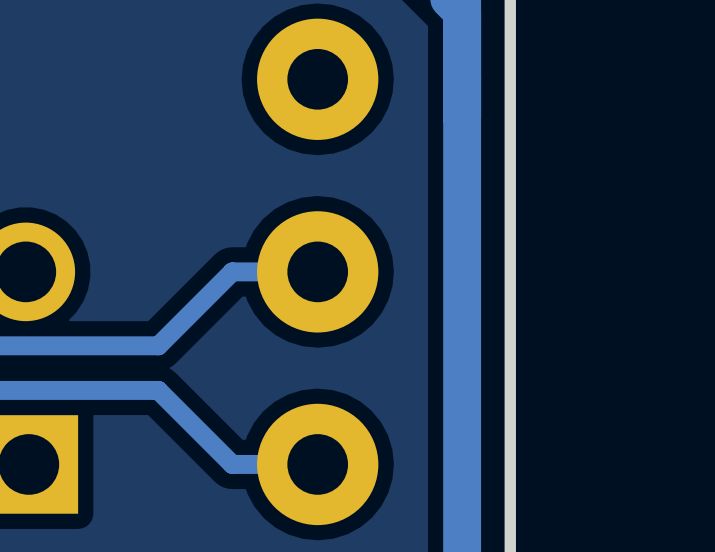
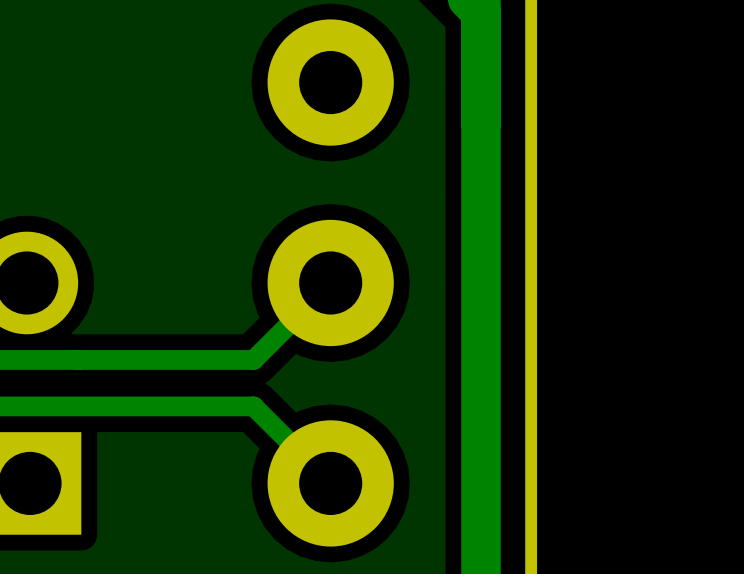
track: (317, 271) (232, 271) (158, 345) -> (330, 282) (253, 359) (164, 359)
track: (158, 390) (232, 464) (317, 464) -> (164, 406) (253, 406) (330, 483)

